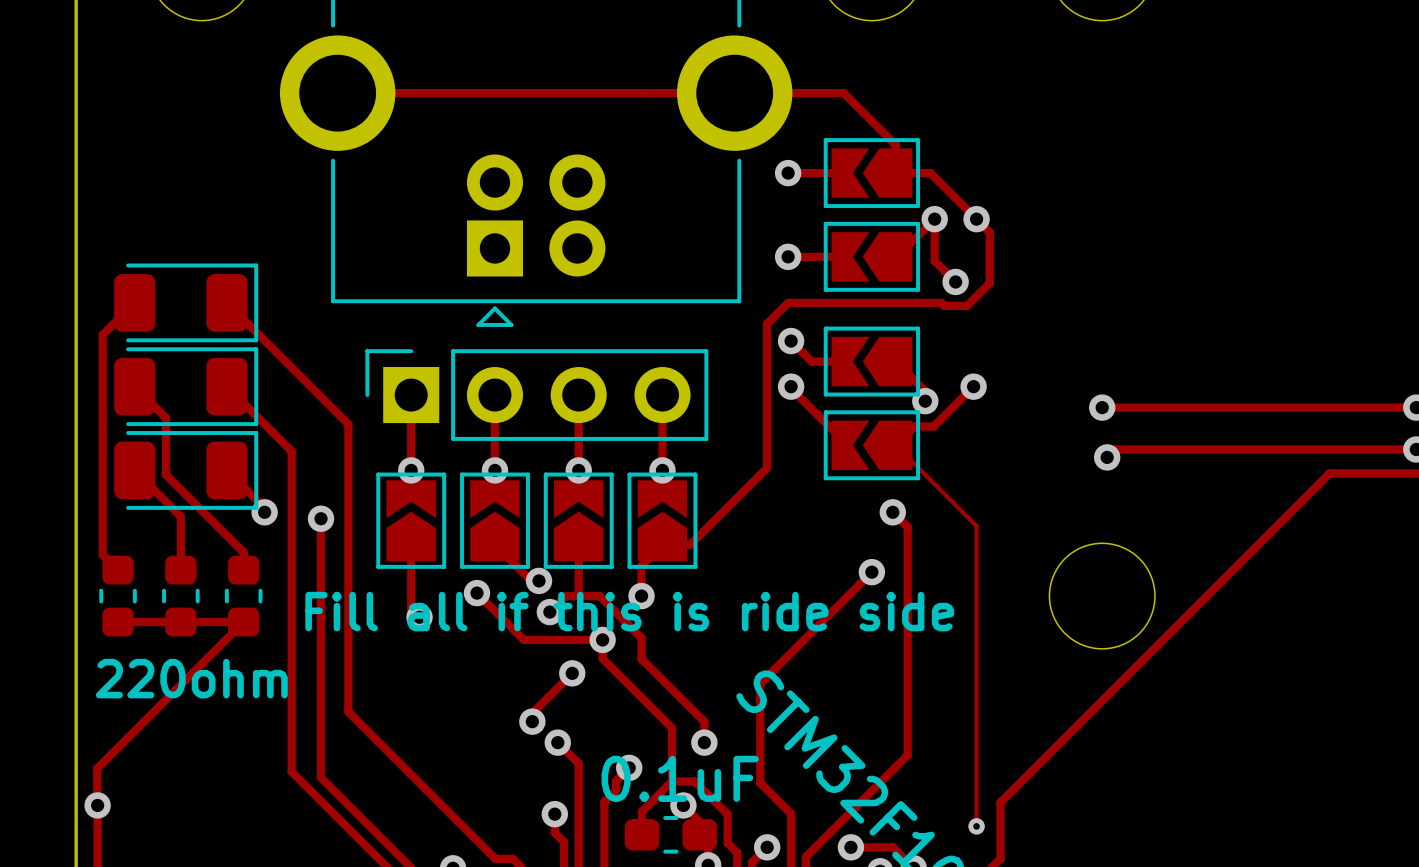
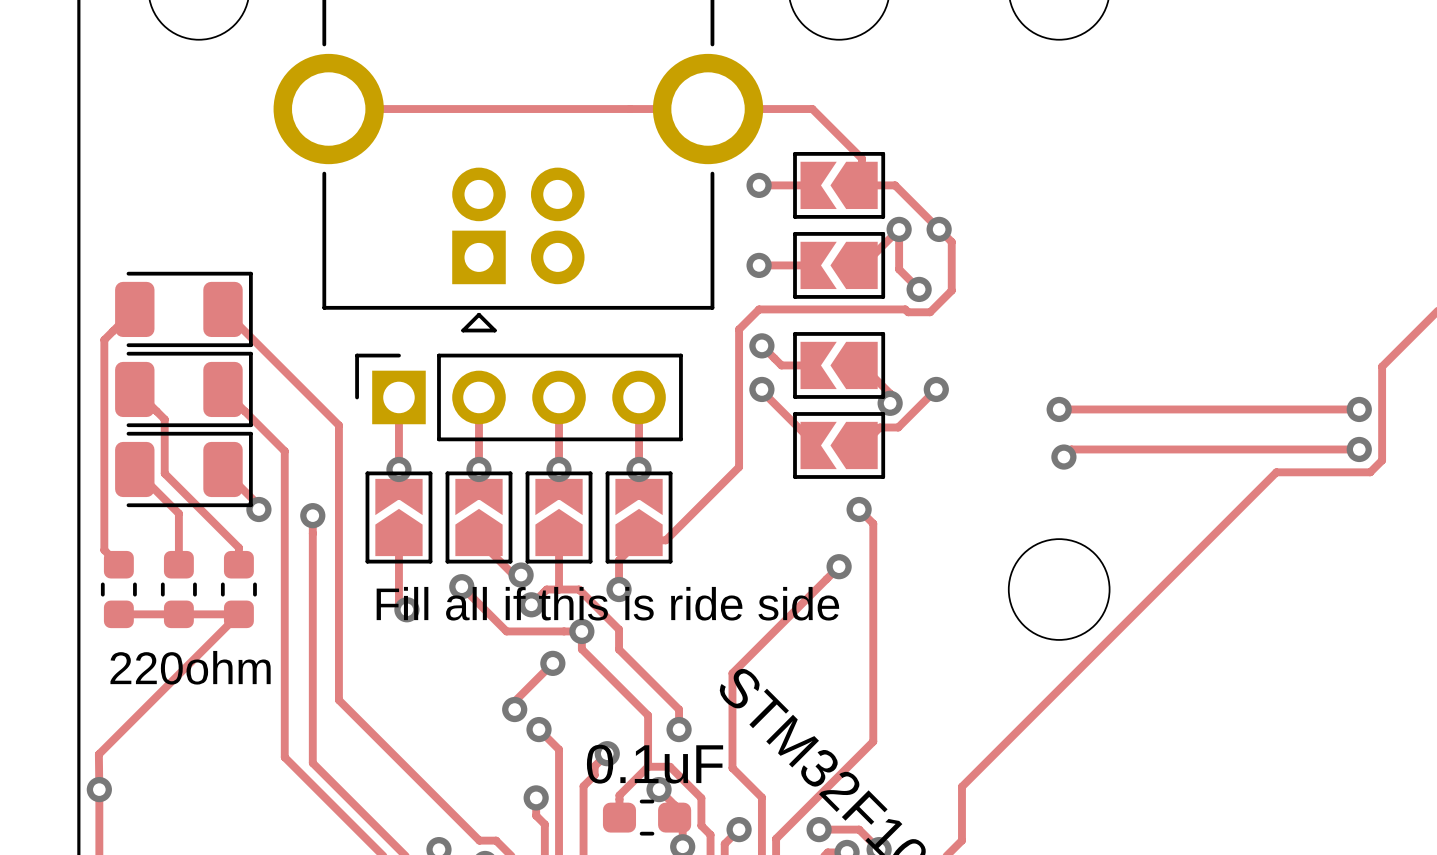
track: (895, 445) (976, 526) (976, 826) -> none
via: (976, 826) -> none

